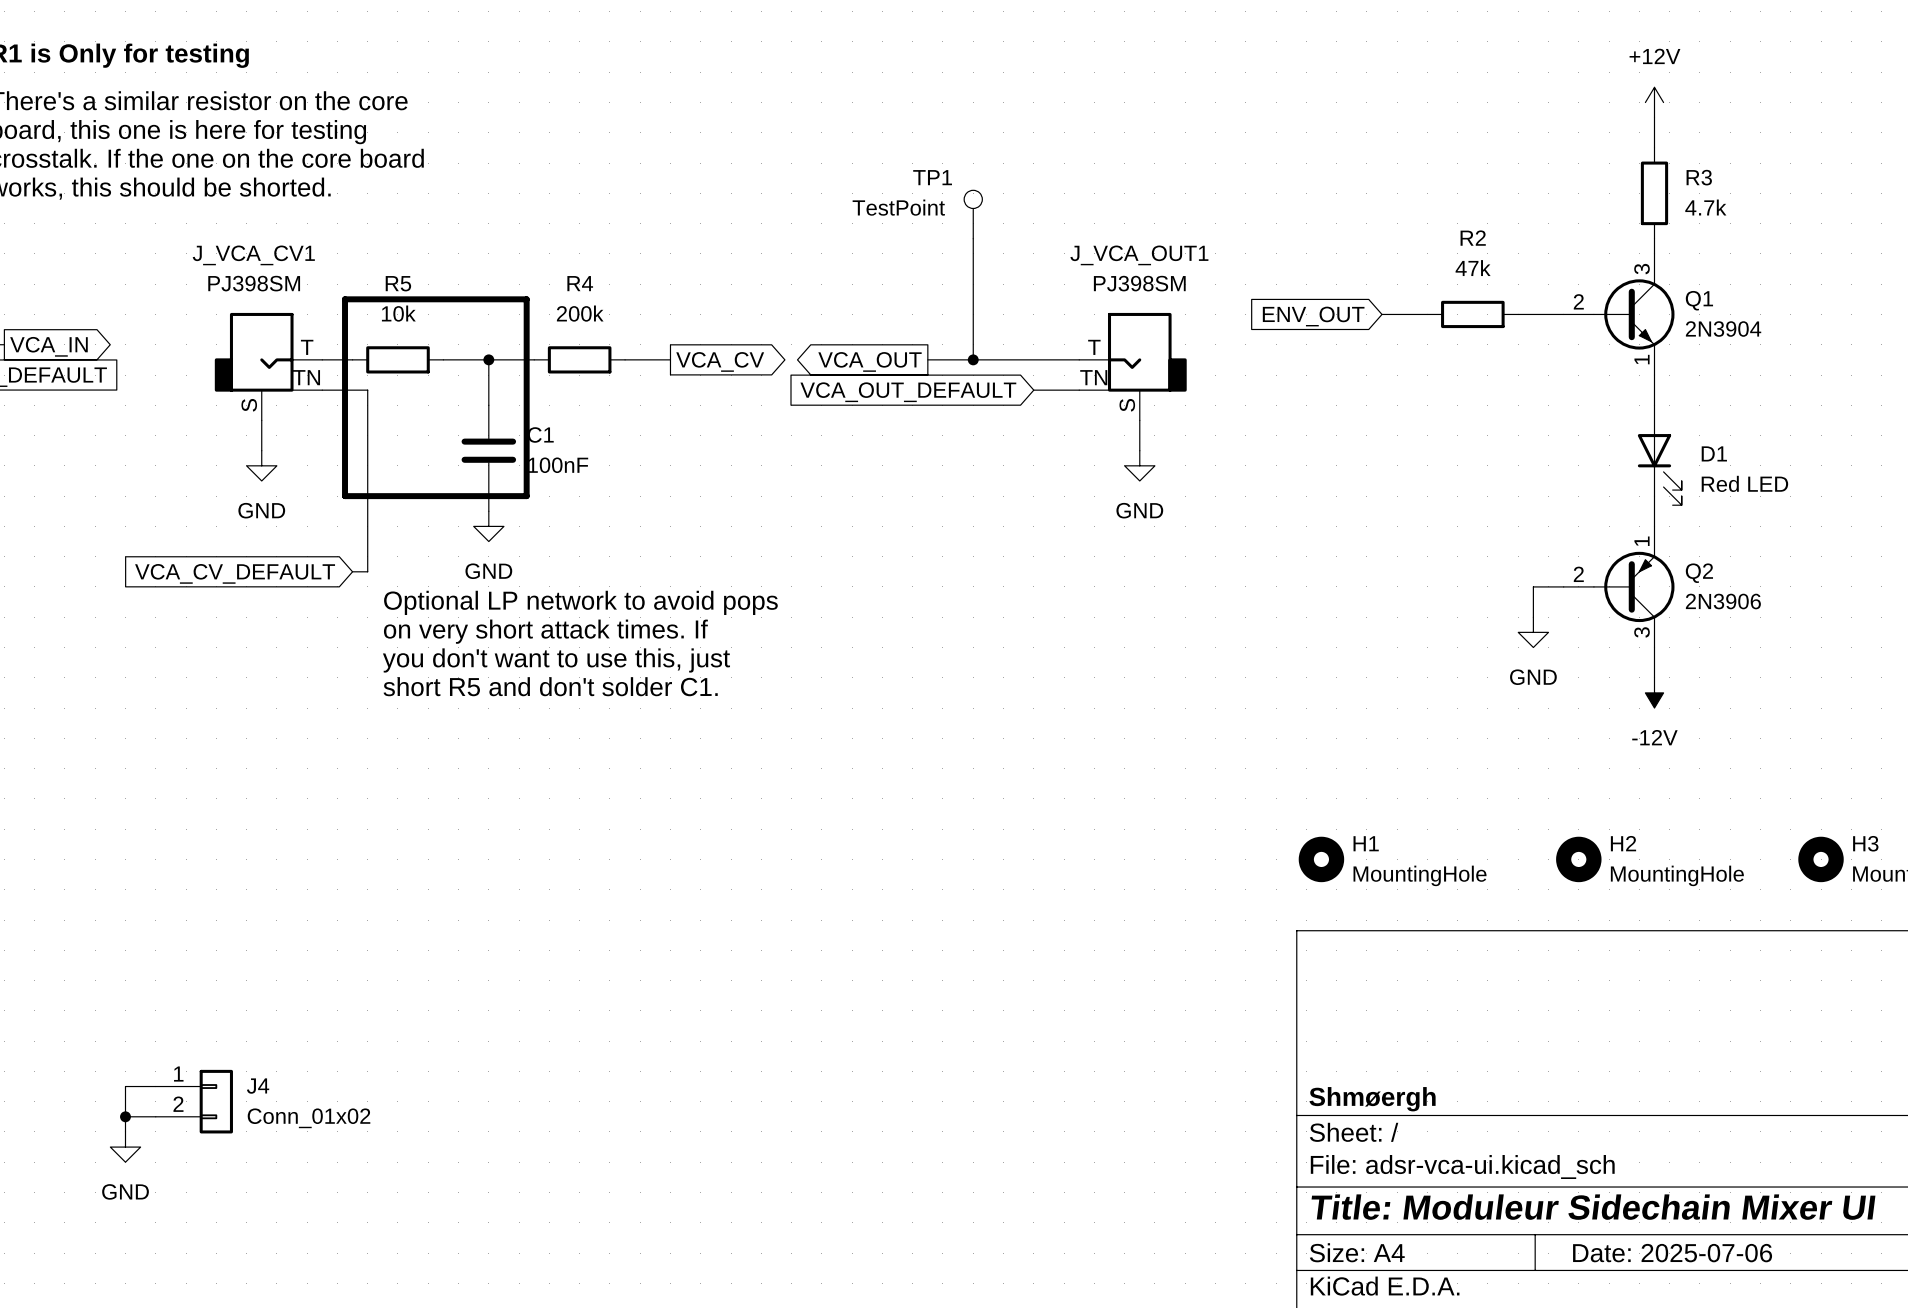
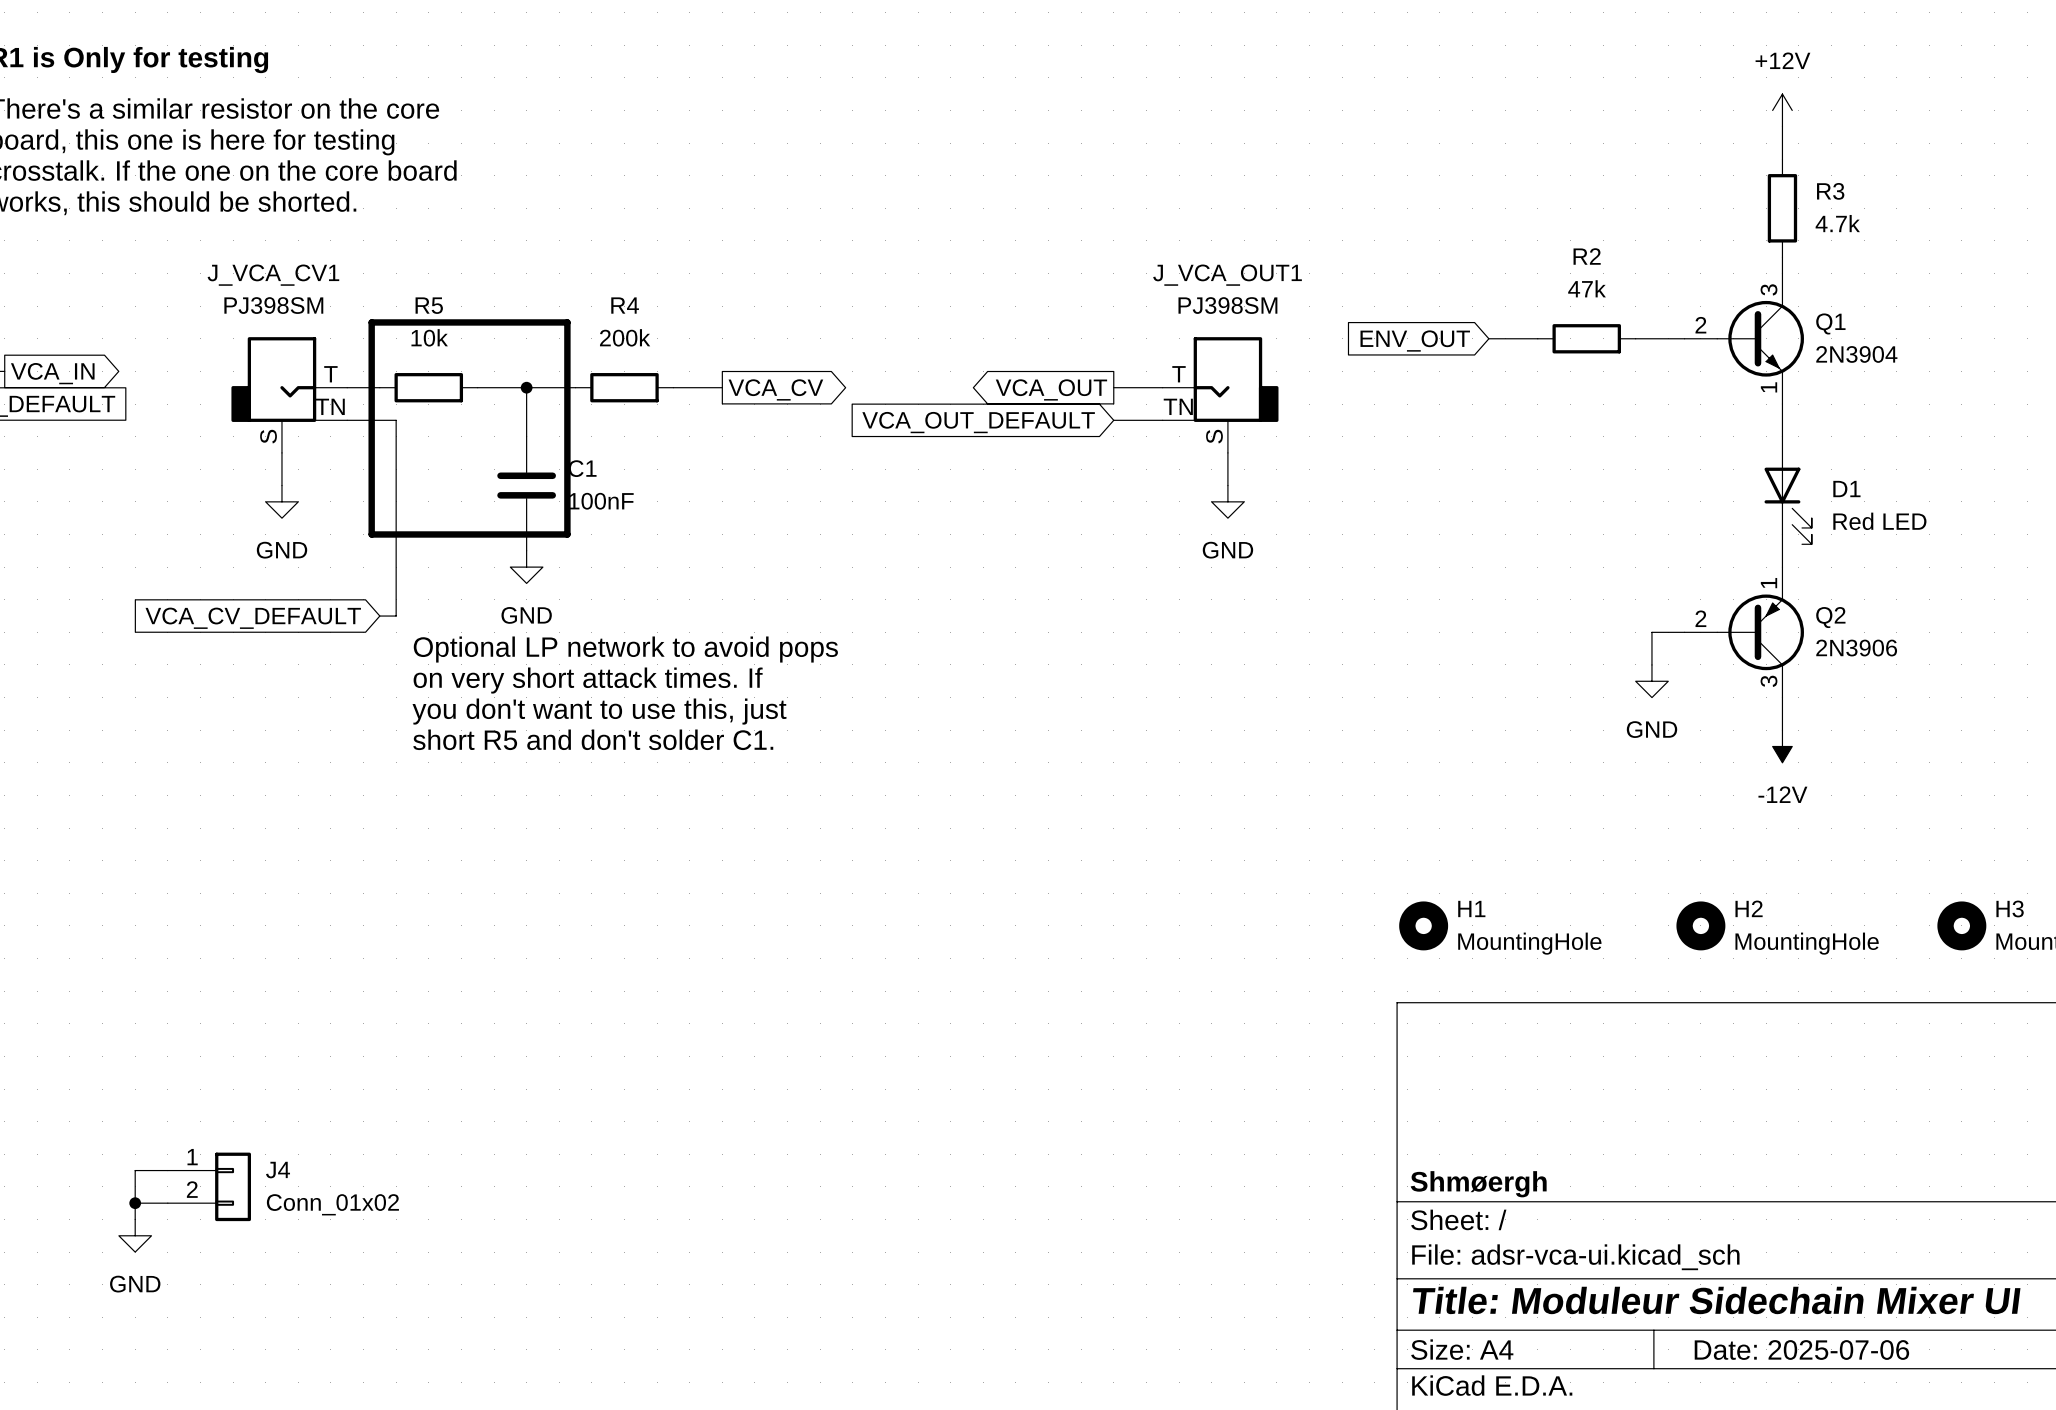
TP1: TestPoint (973, 214) -> none
wire: (973, 238) (973, 359) -> none
wire: (927, 359) (1033, 359) -> none
junction: (973, 359) -> none
global label position: VCA_OUT (869, 361) -> VCA_OUT (1051, 389)

